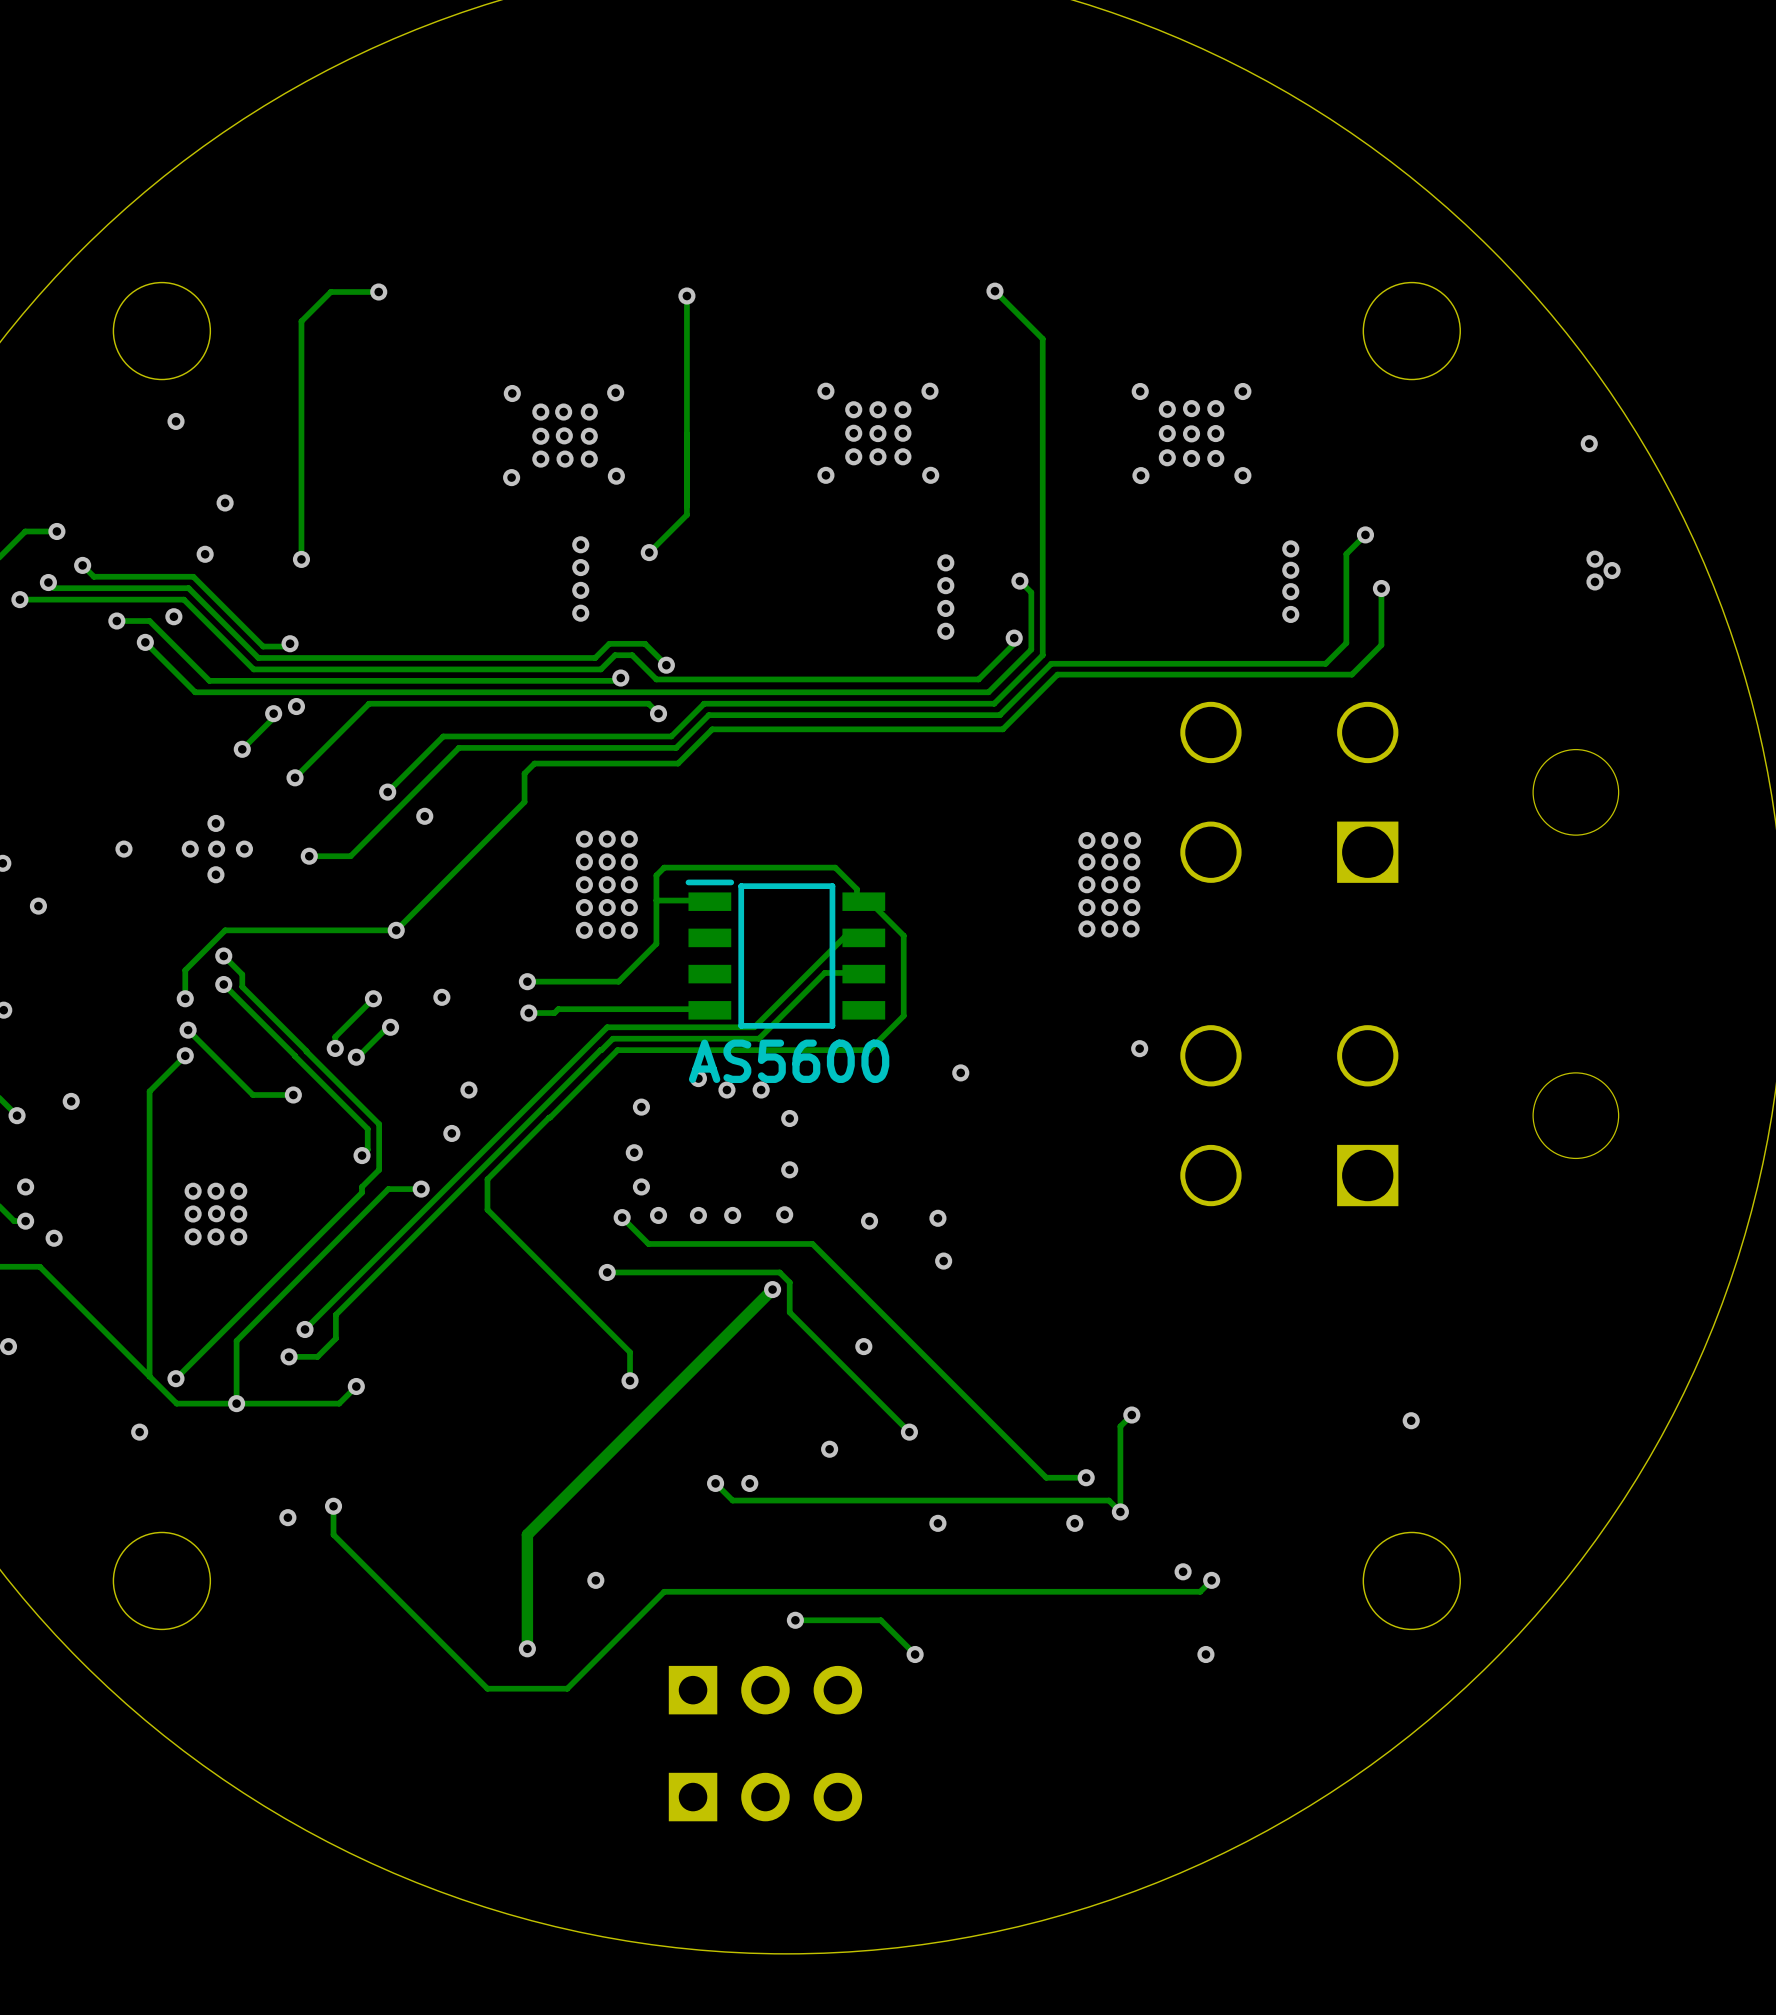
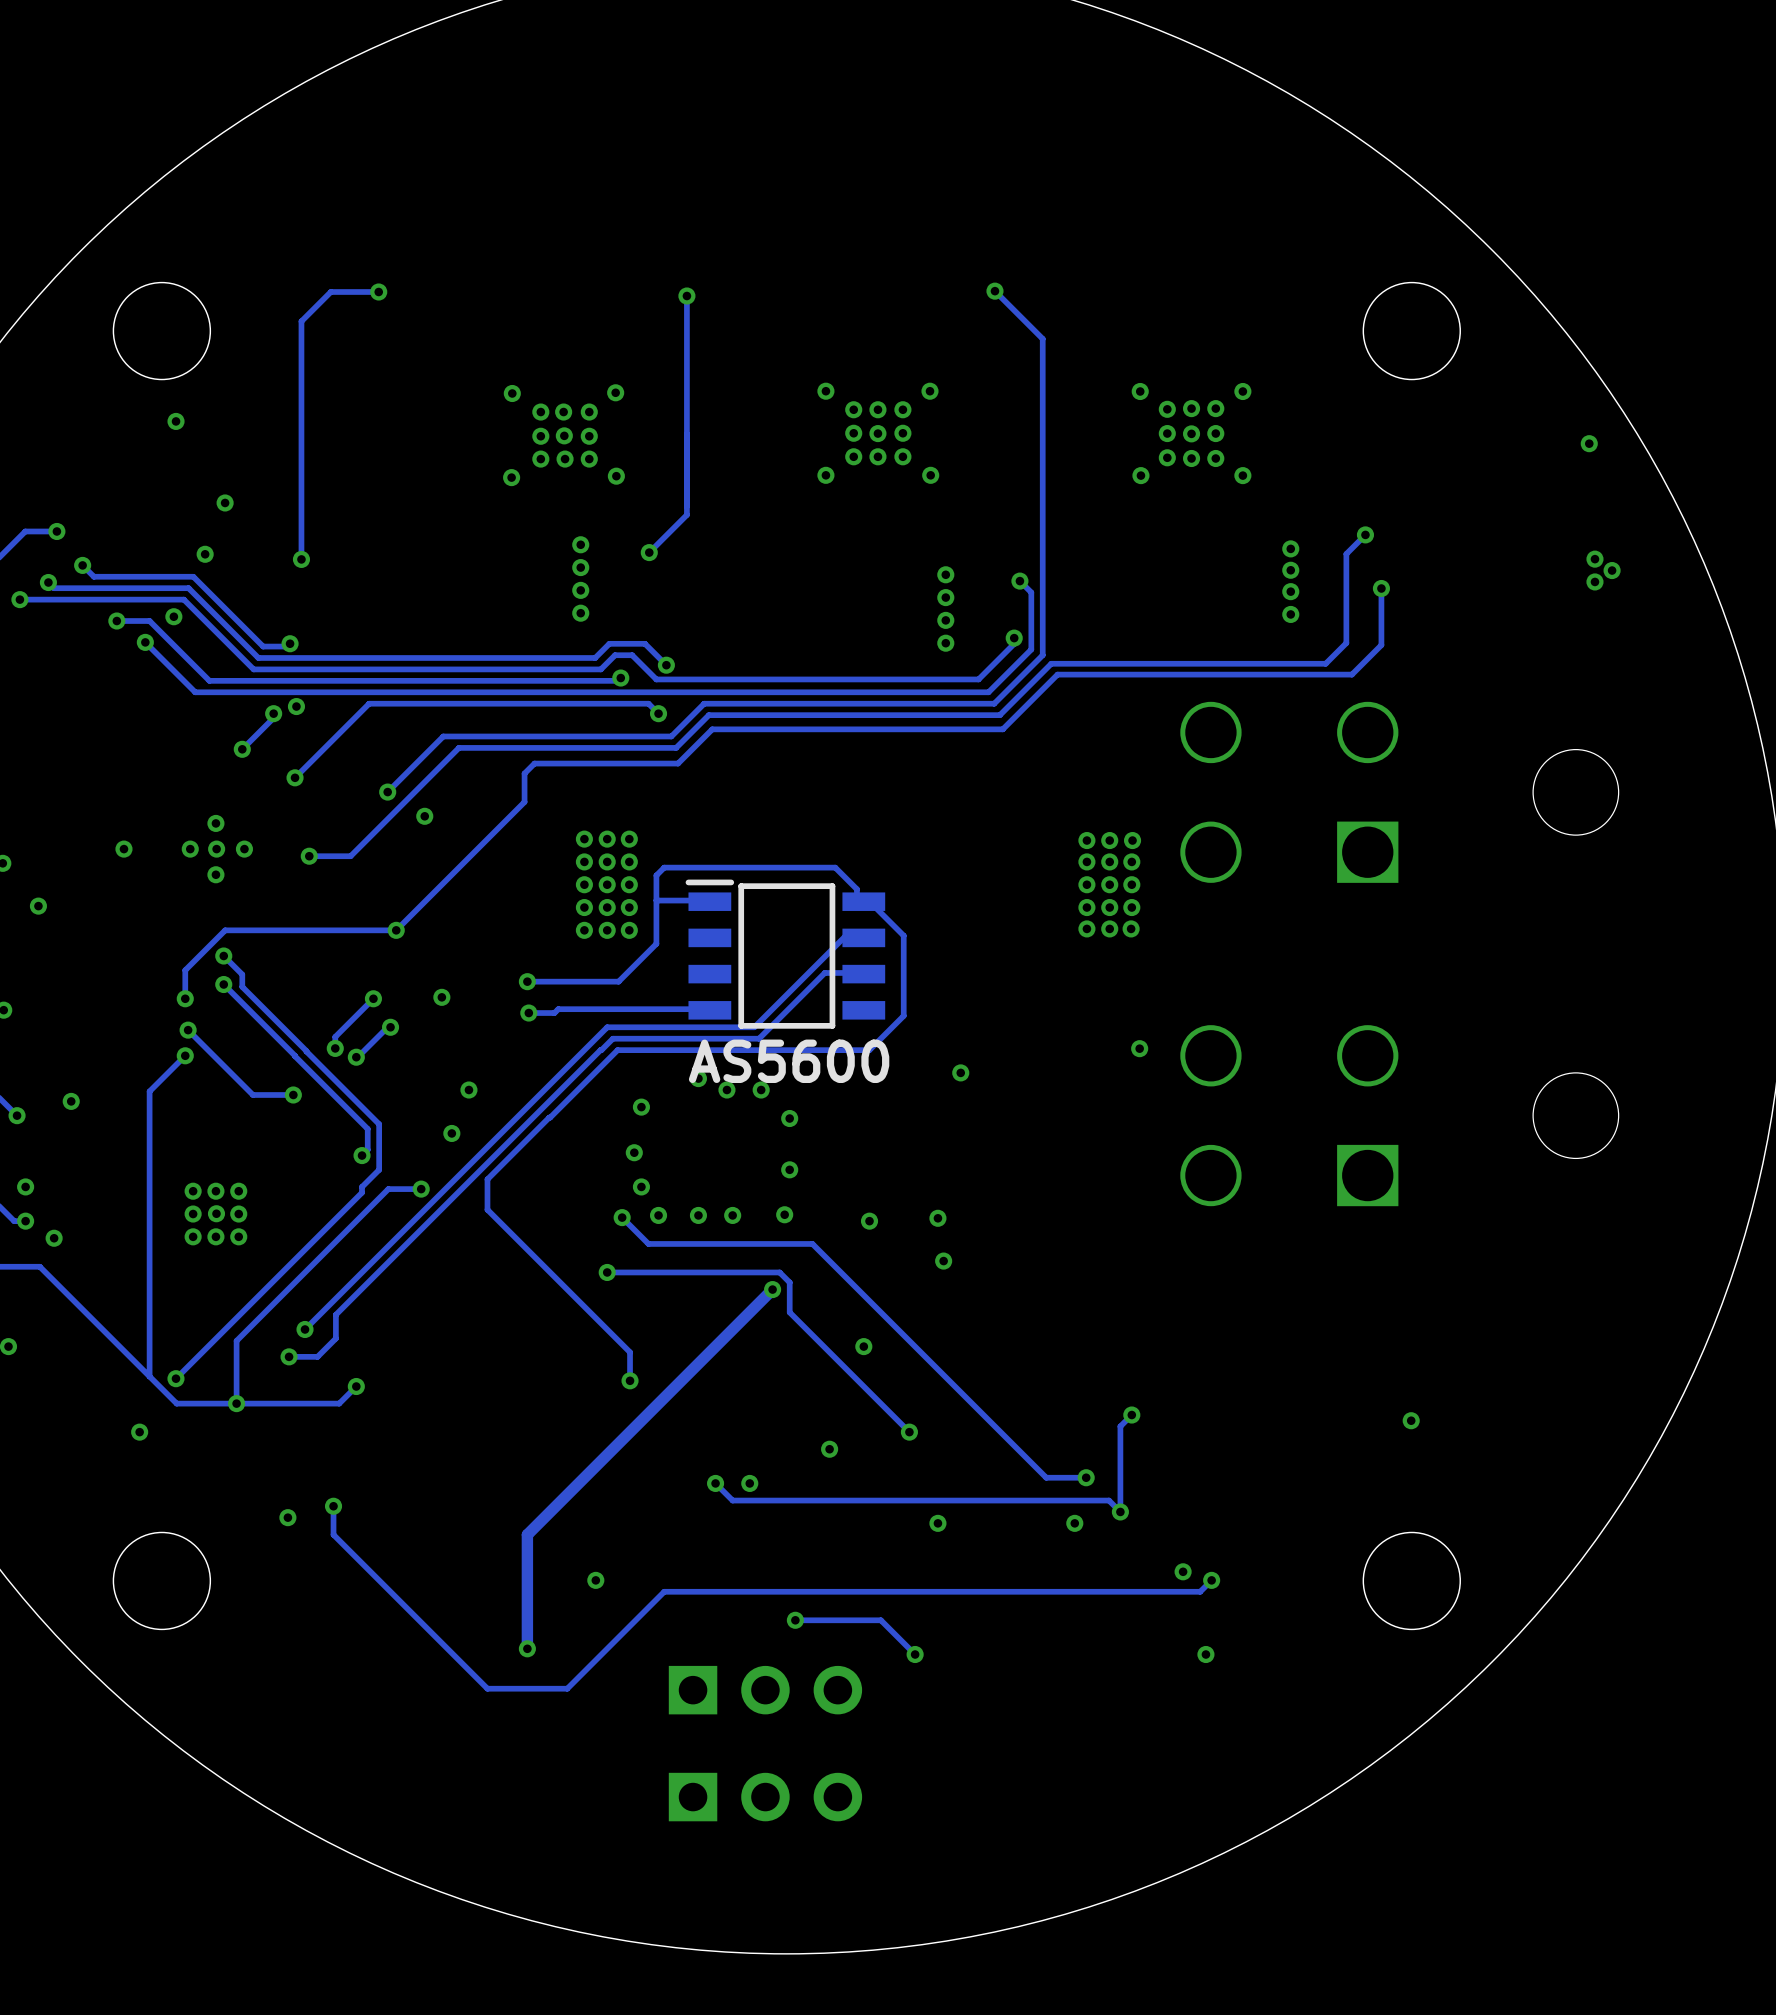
via: (945, 562) -> none
via: none -> (945, 574)
via: (945, 585) -> none
via: none -> (945, 597)
via: (945, 608) -> none
via: none -> (945, 620)
via: (945, 631) -> none
via: none -> (945, 643)

